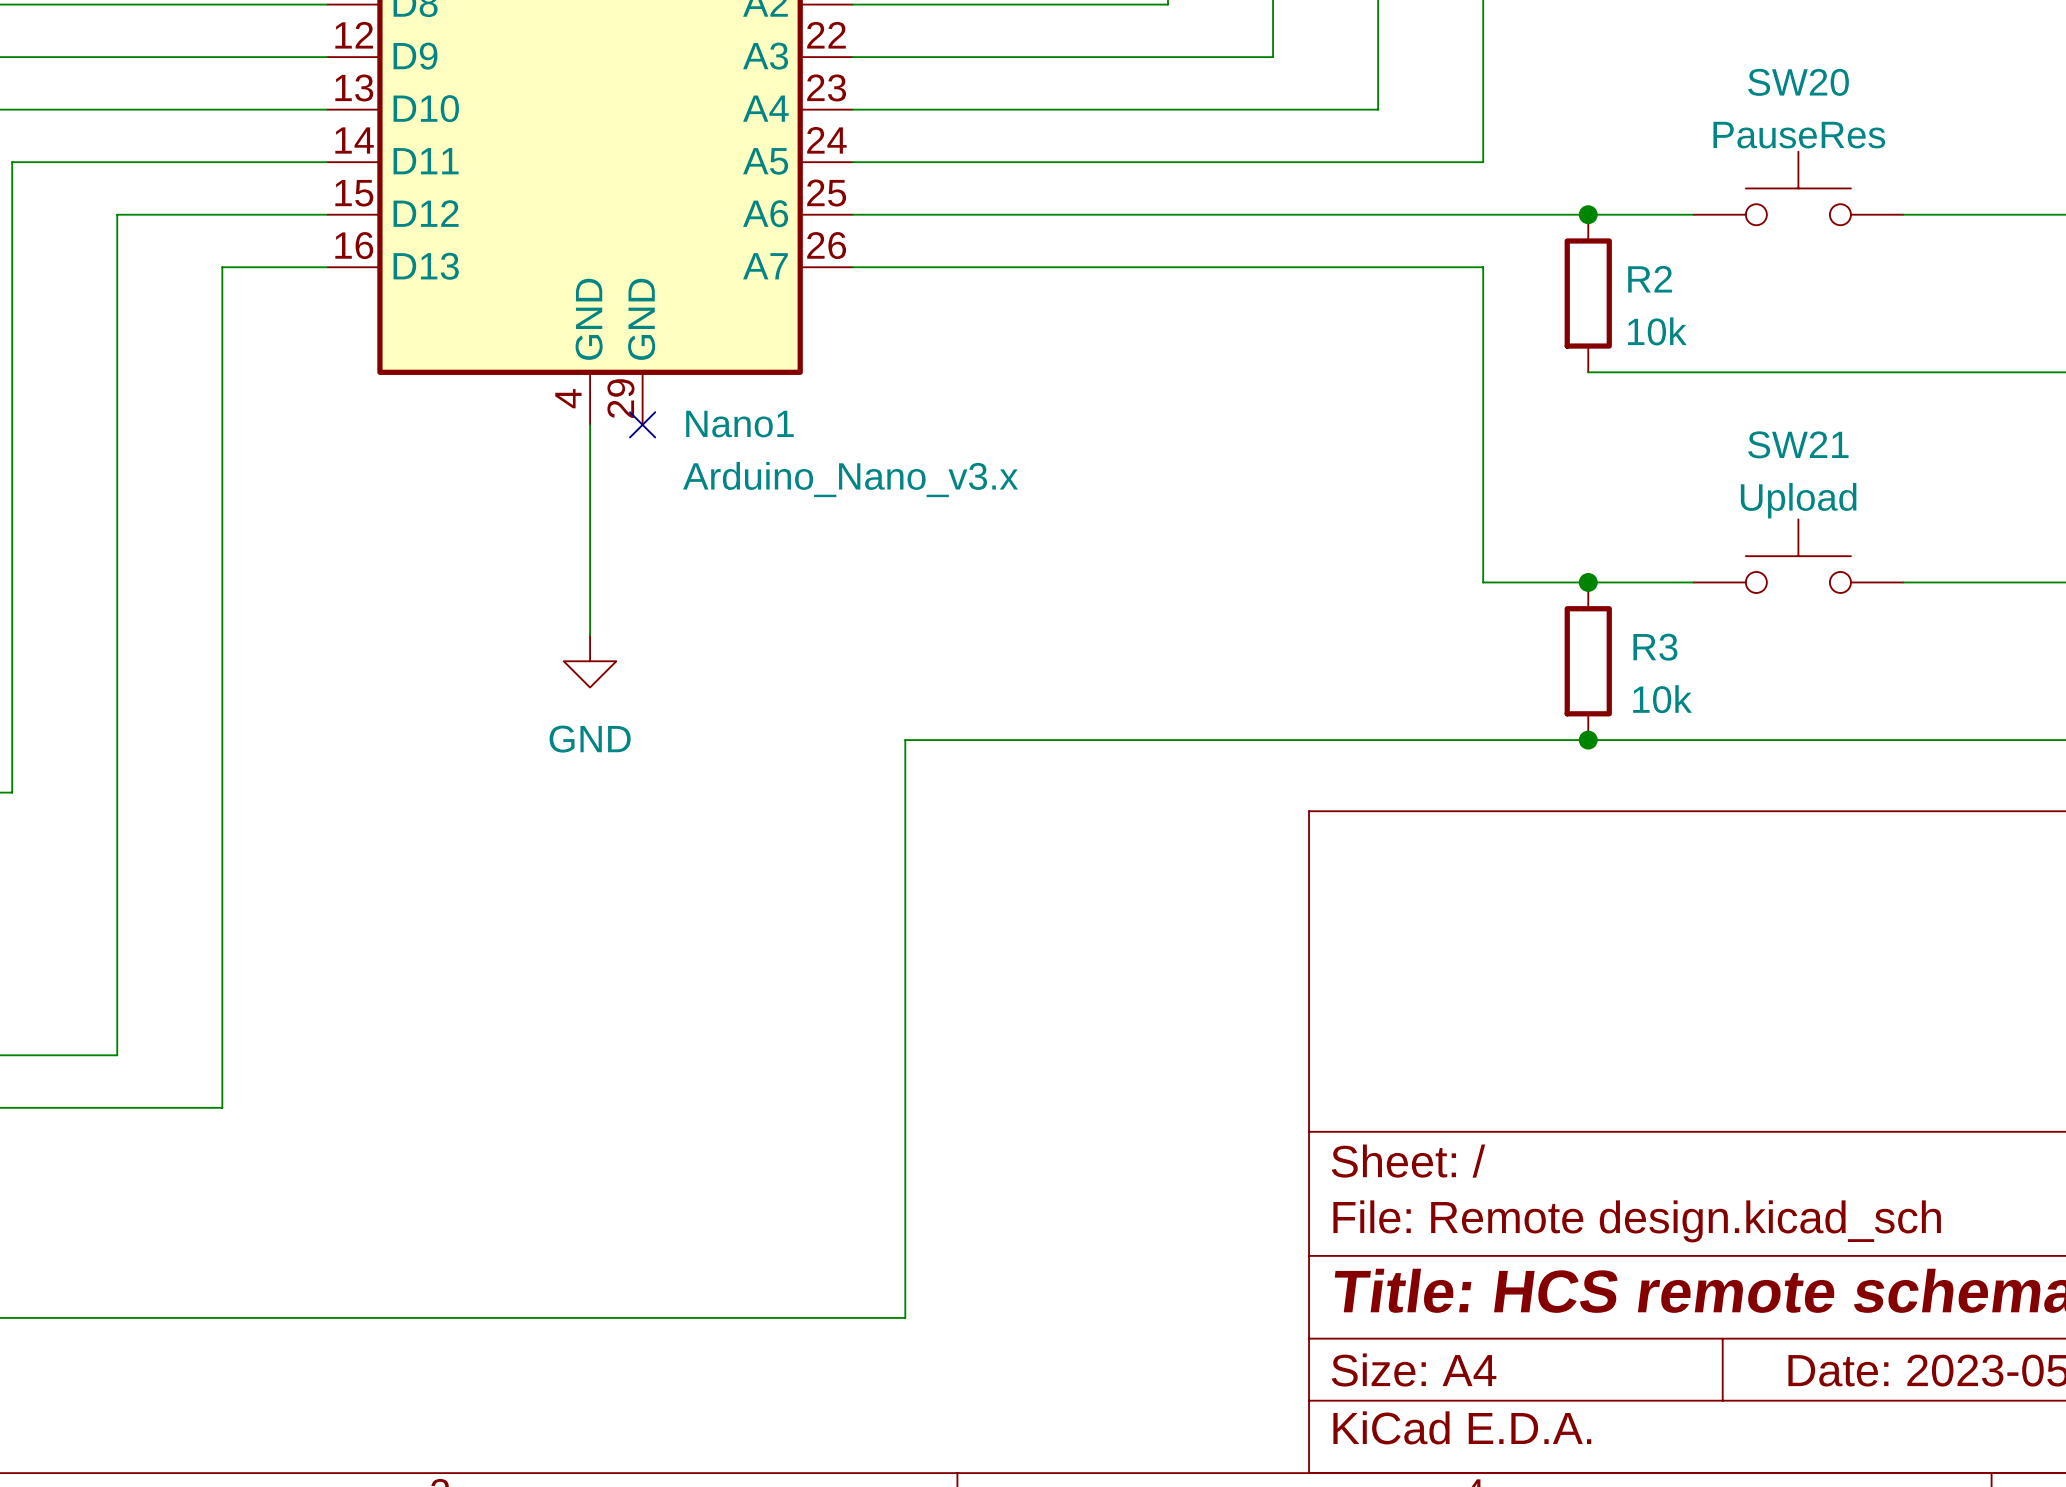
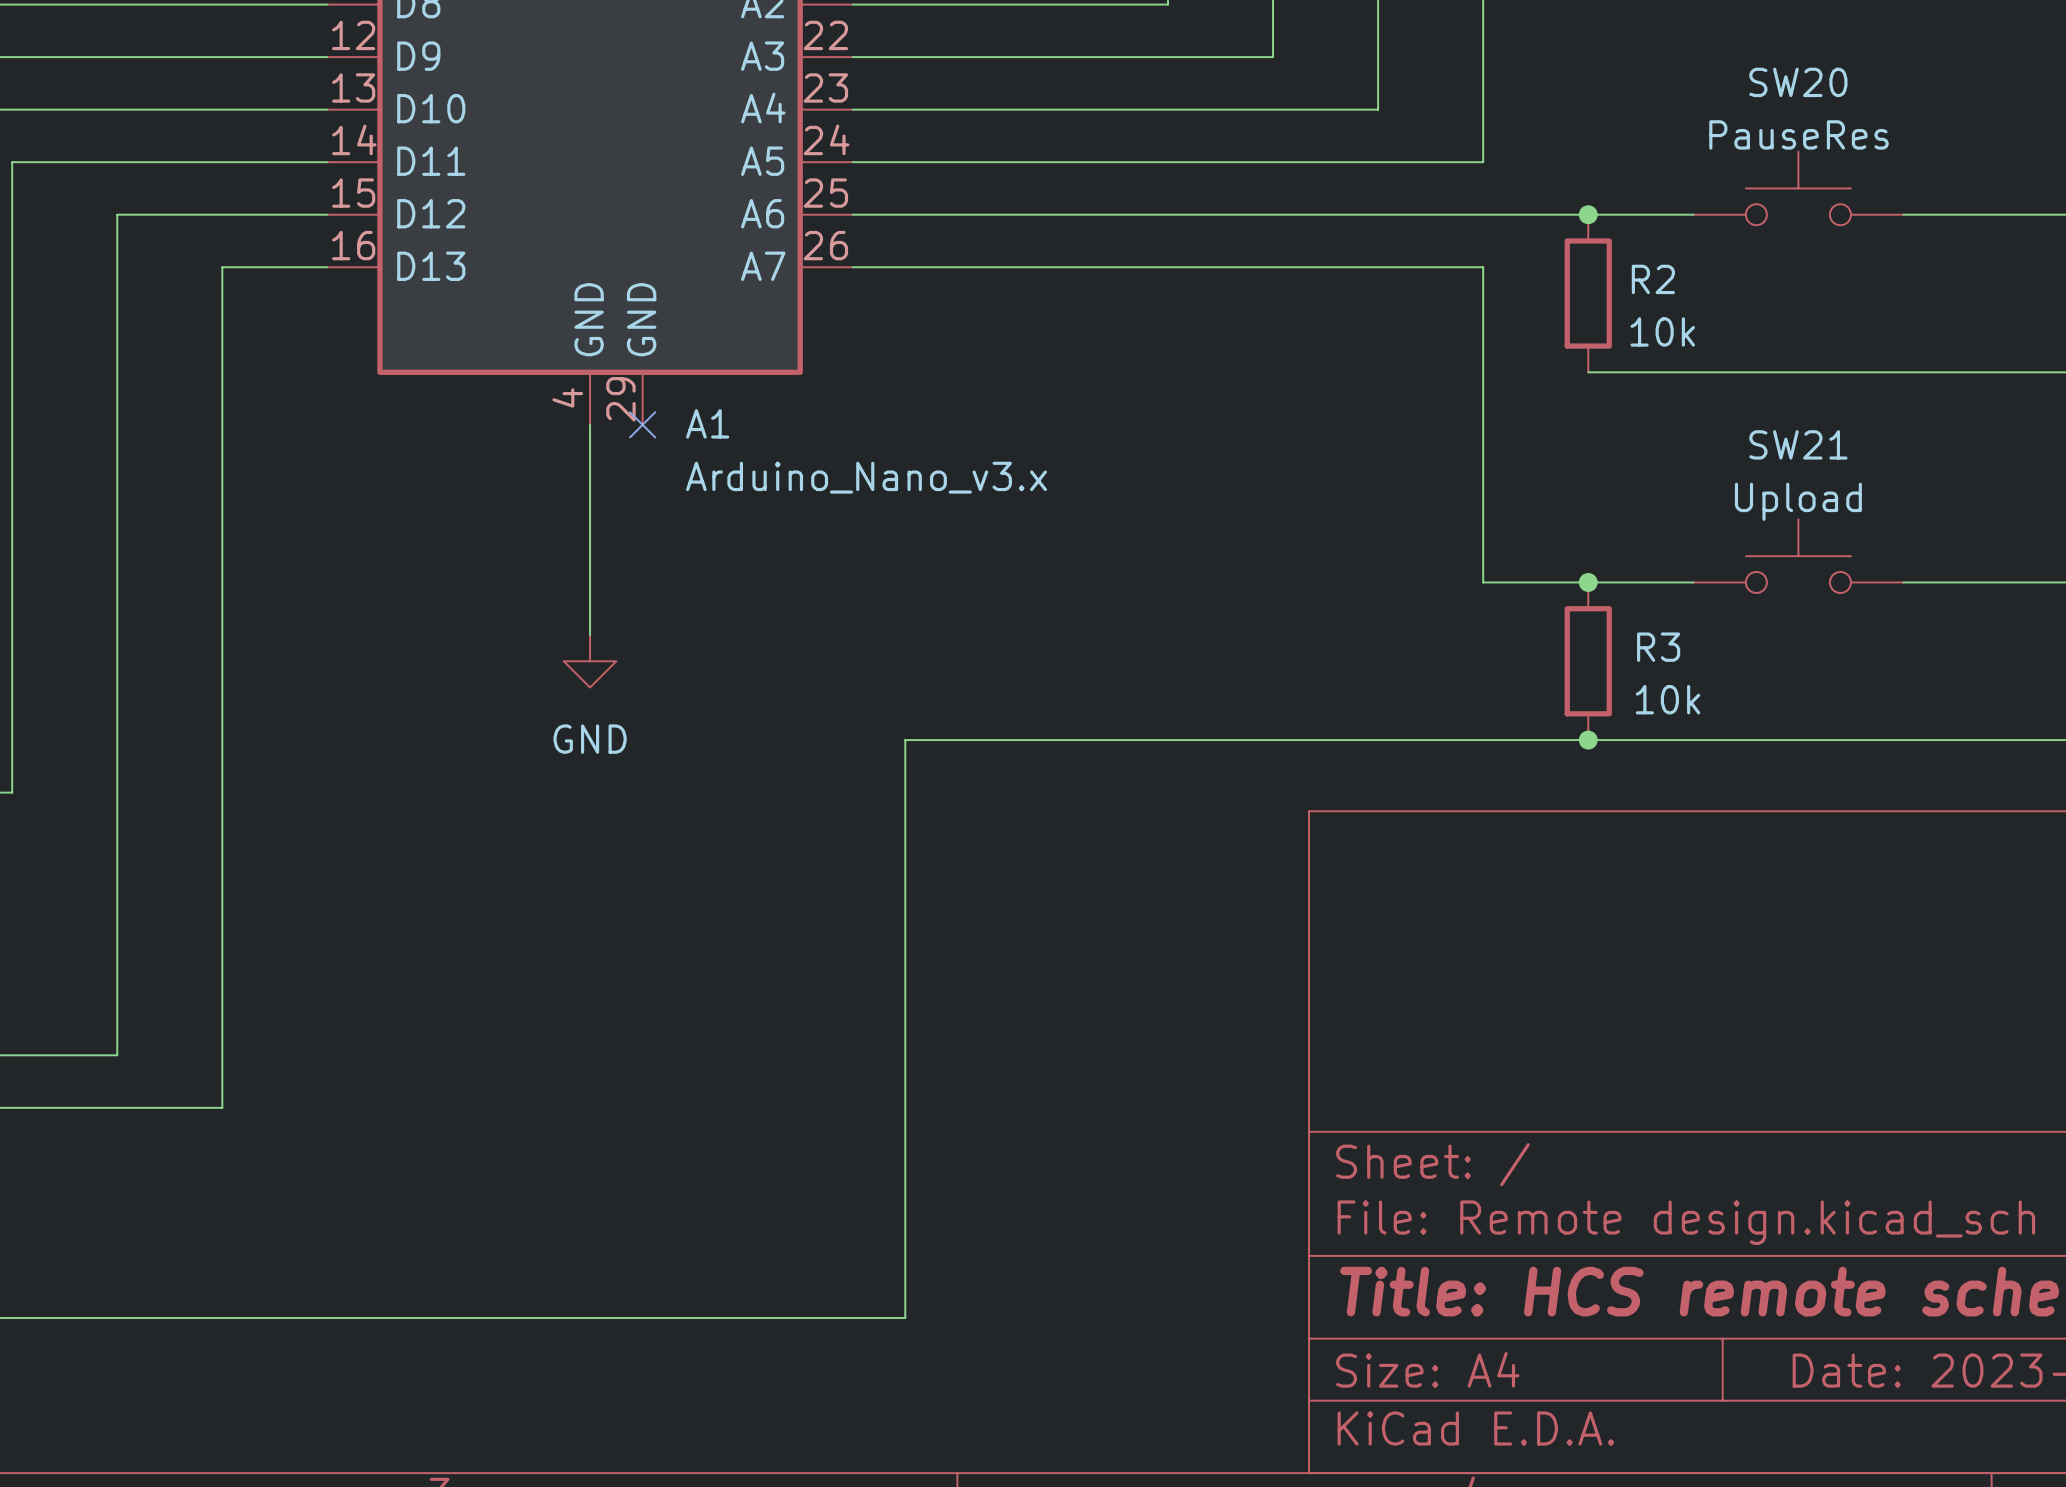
Nano1 name: Nano1 (739, 424) -> A1 (707, 423)

